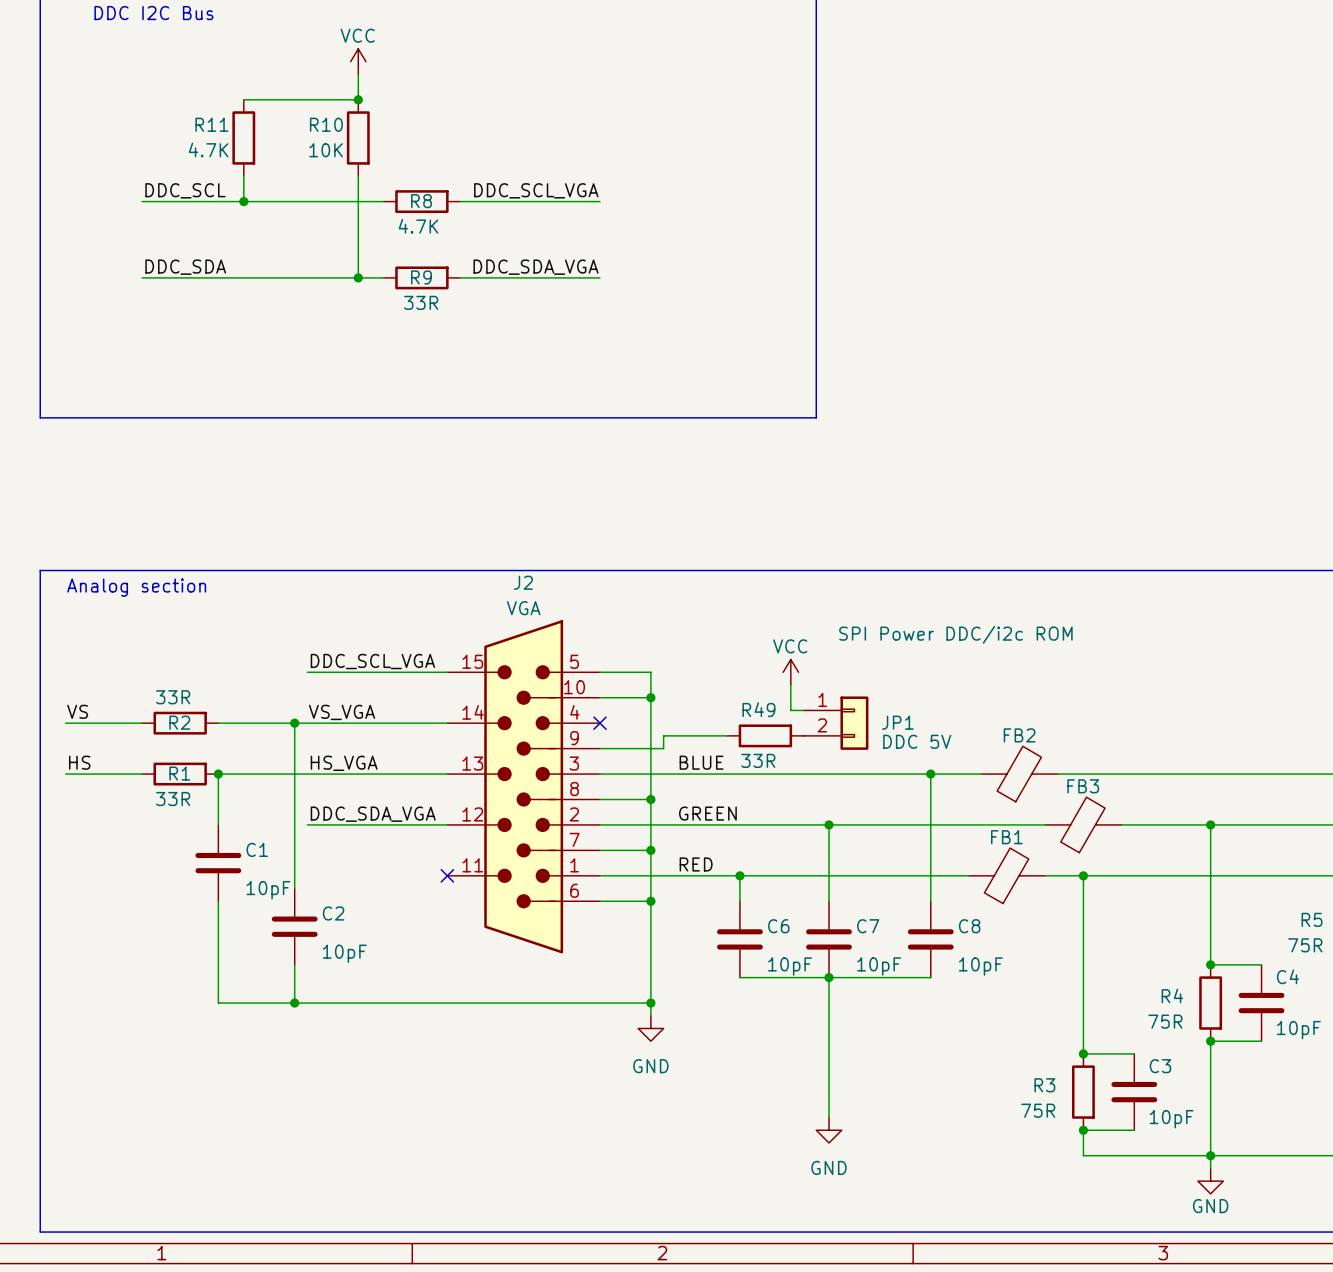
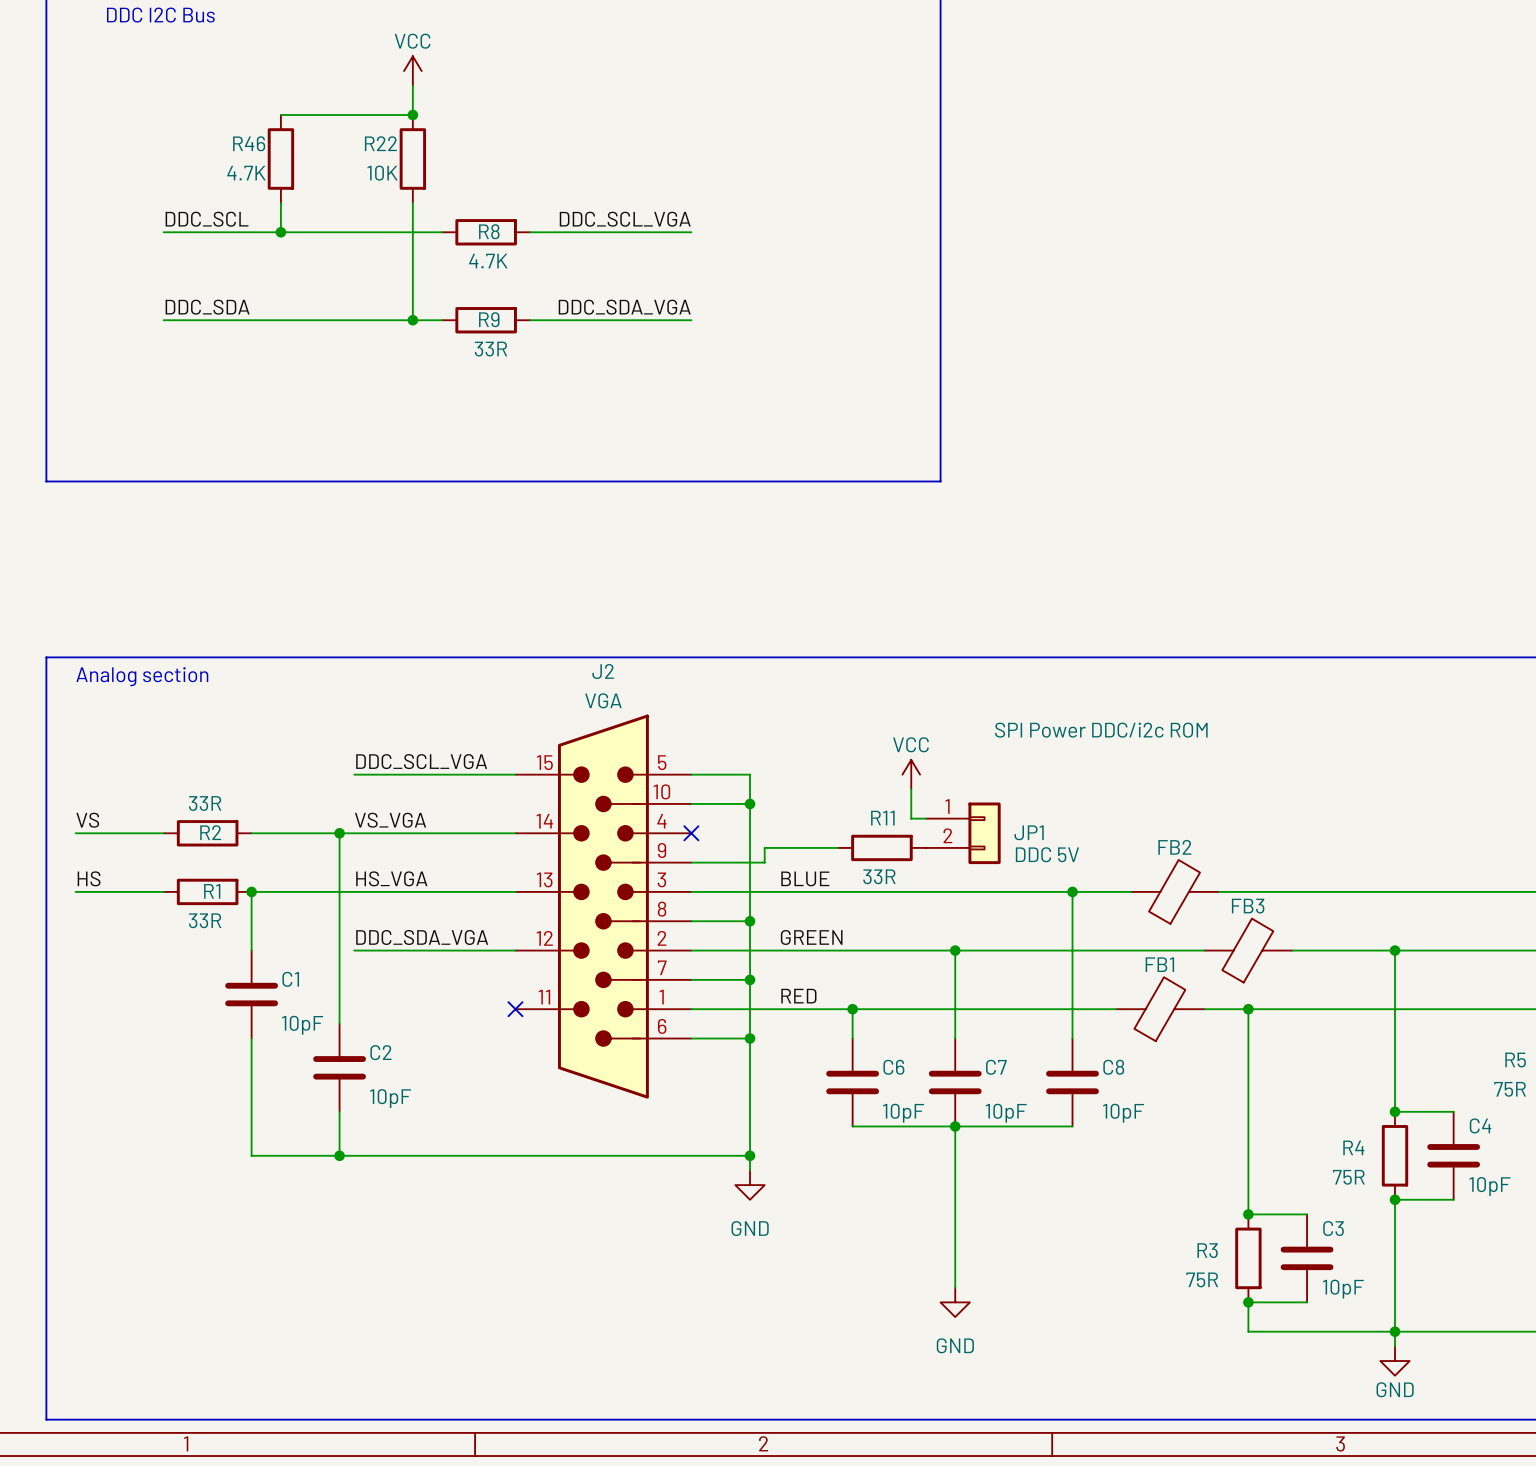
R11 name: R11 (211, 124) -> R46 (249, 143)
R10 name: R10 (326, 124) -> R22 (380, 143)
R49 name: R49 (758, 709) -> R11 (882, 818)

